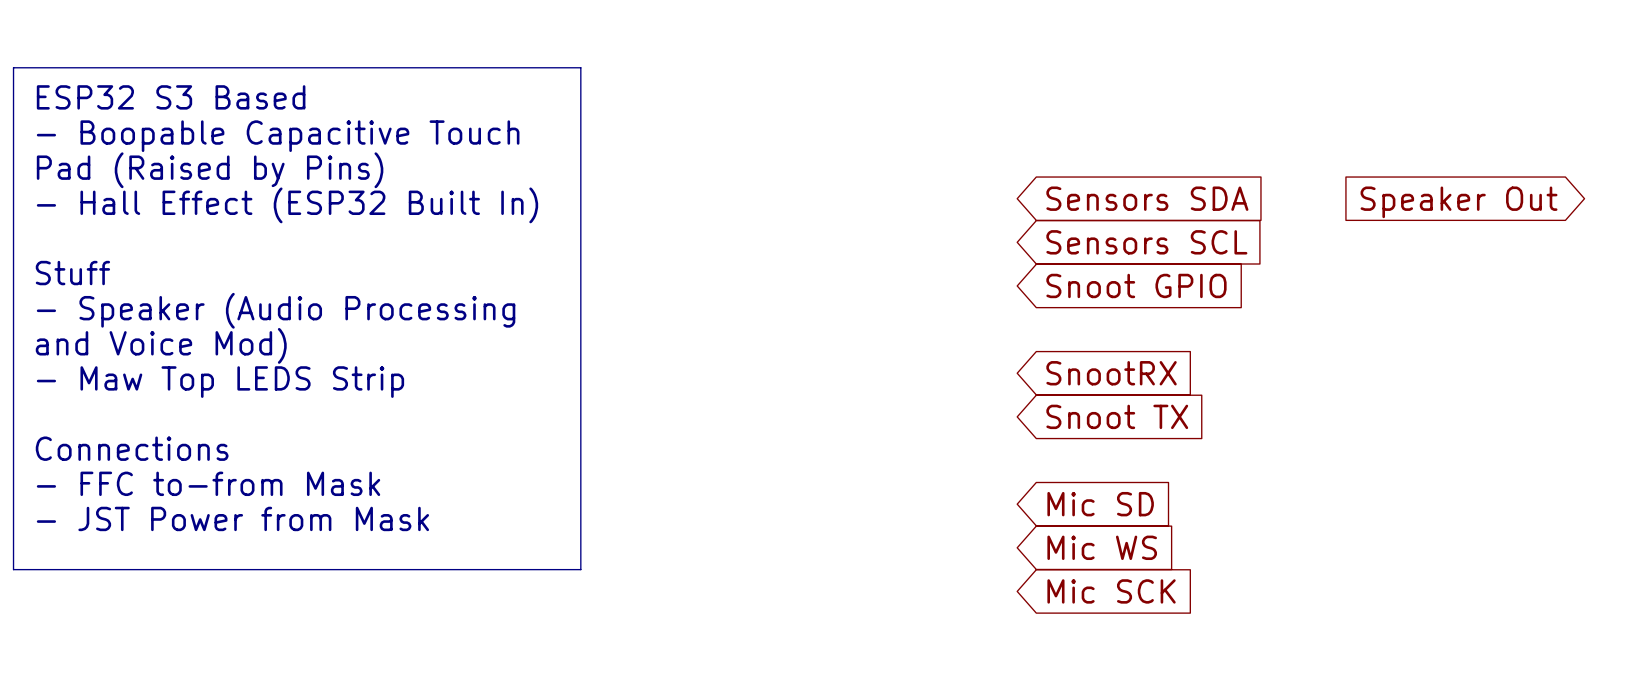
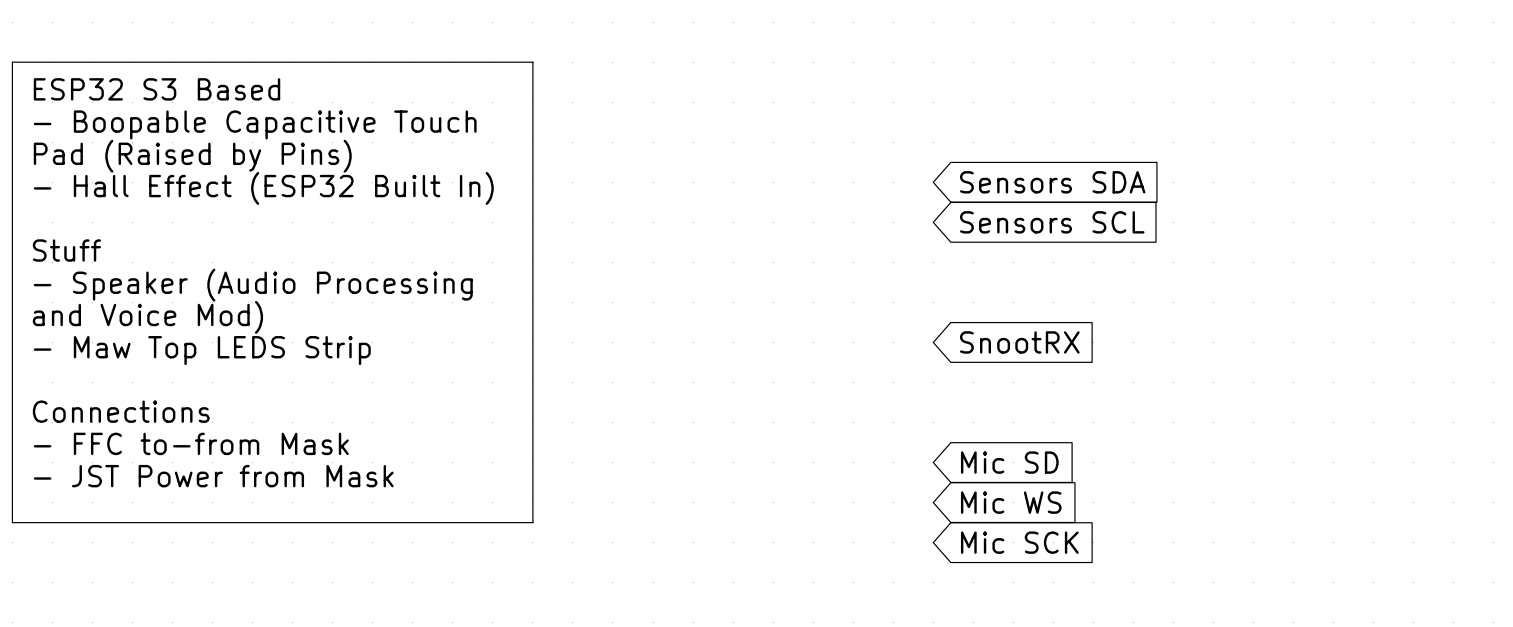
global label: Speaker Out (1459, 202) -> none
global label: Snoot GPIO (1136, 285) -> none
global label: Snoot TX (1117, 416) -> none

